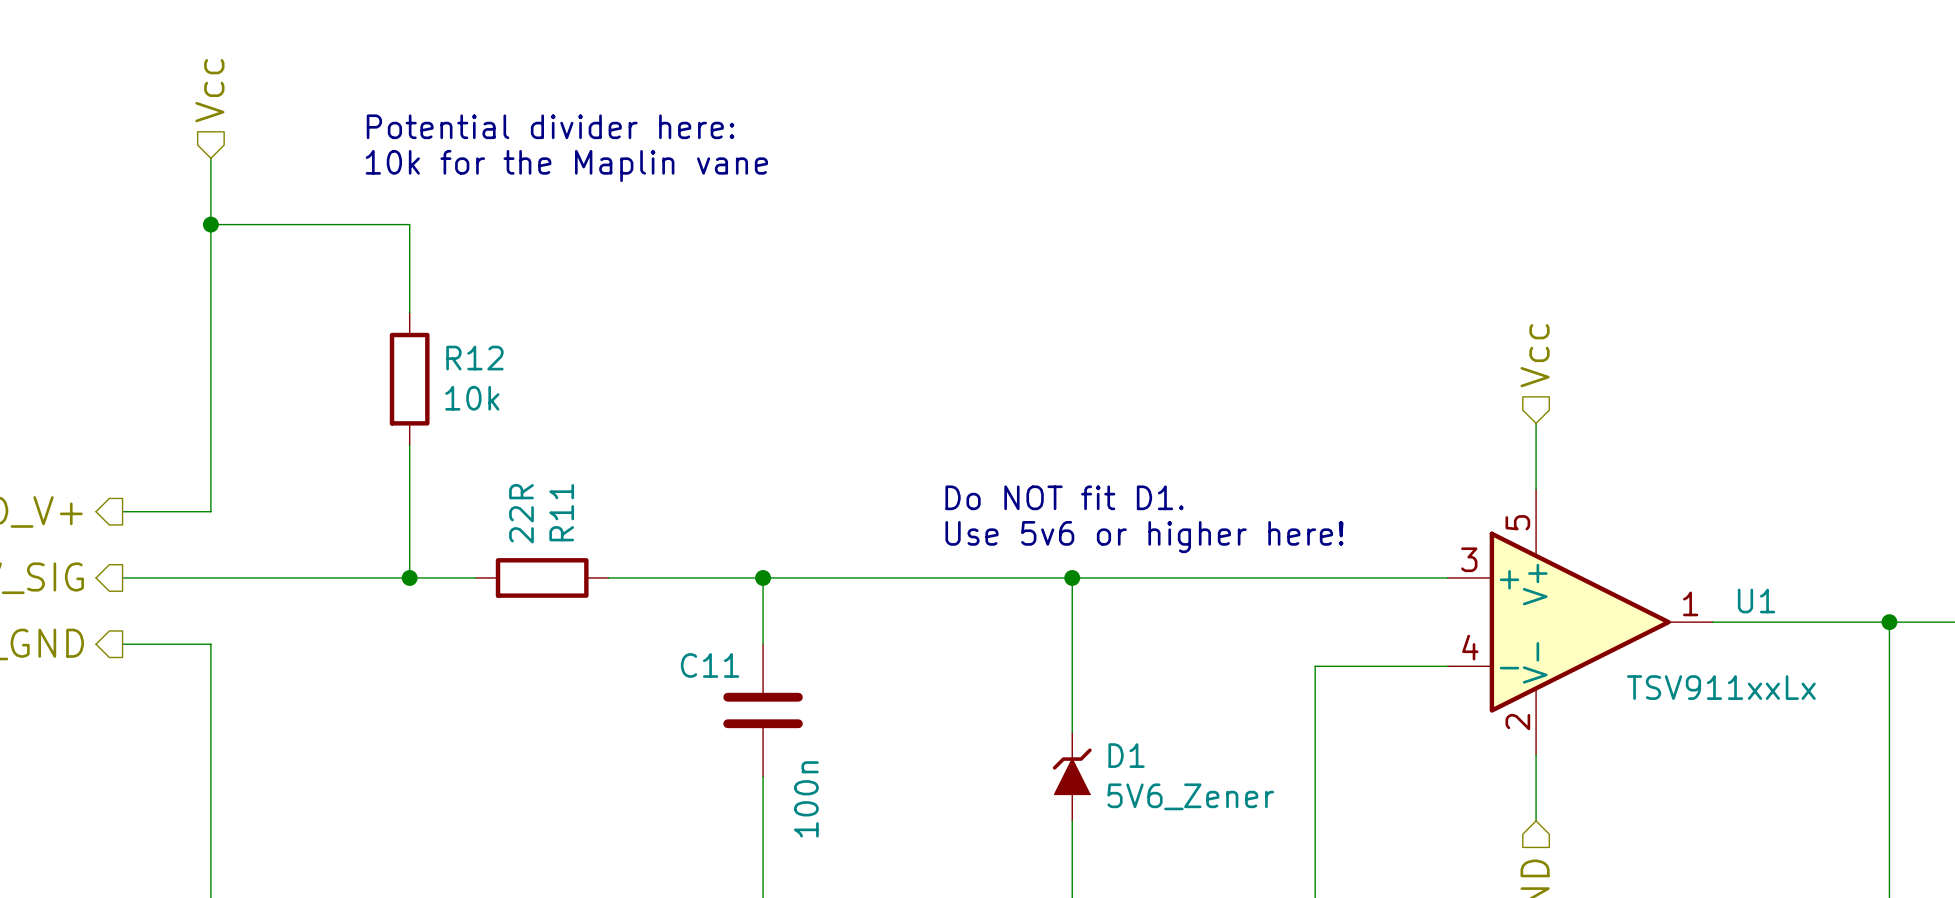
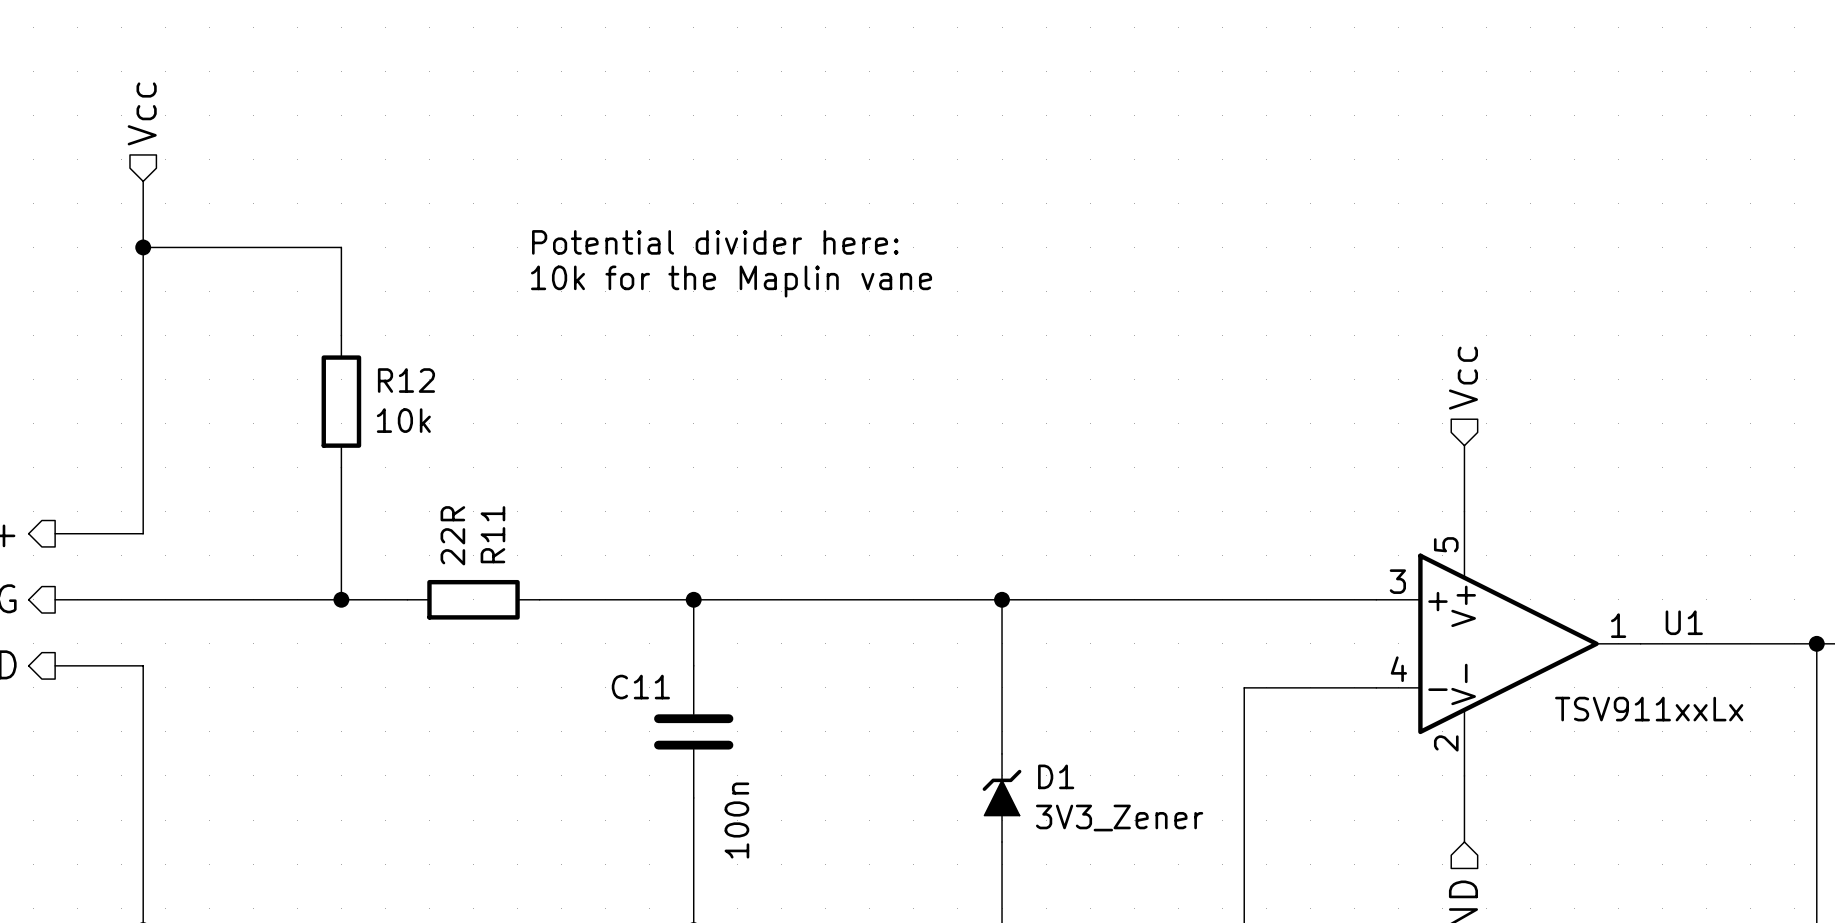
text position: Potential divider here: (550, 126) -> Potential divider here: (715, 242)
text position: 10k for the Maplin vane (566, 166) -> 10k for the Maplin vane (731, 281)
text: Do NOT fit D1. (1064, 497) -> none
text: Use 5v6 or higher here! (1144, 537) -> none
D1 value: 5V6_Zener (1190, 796) -> 3V3_Zener (1119, 818)

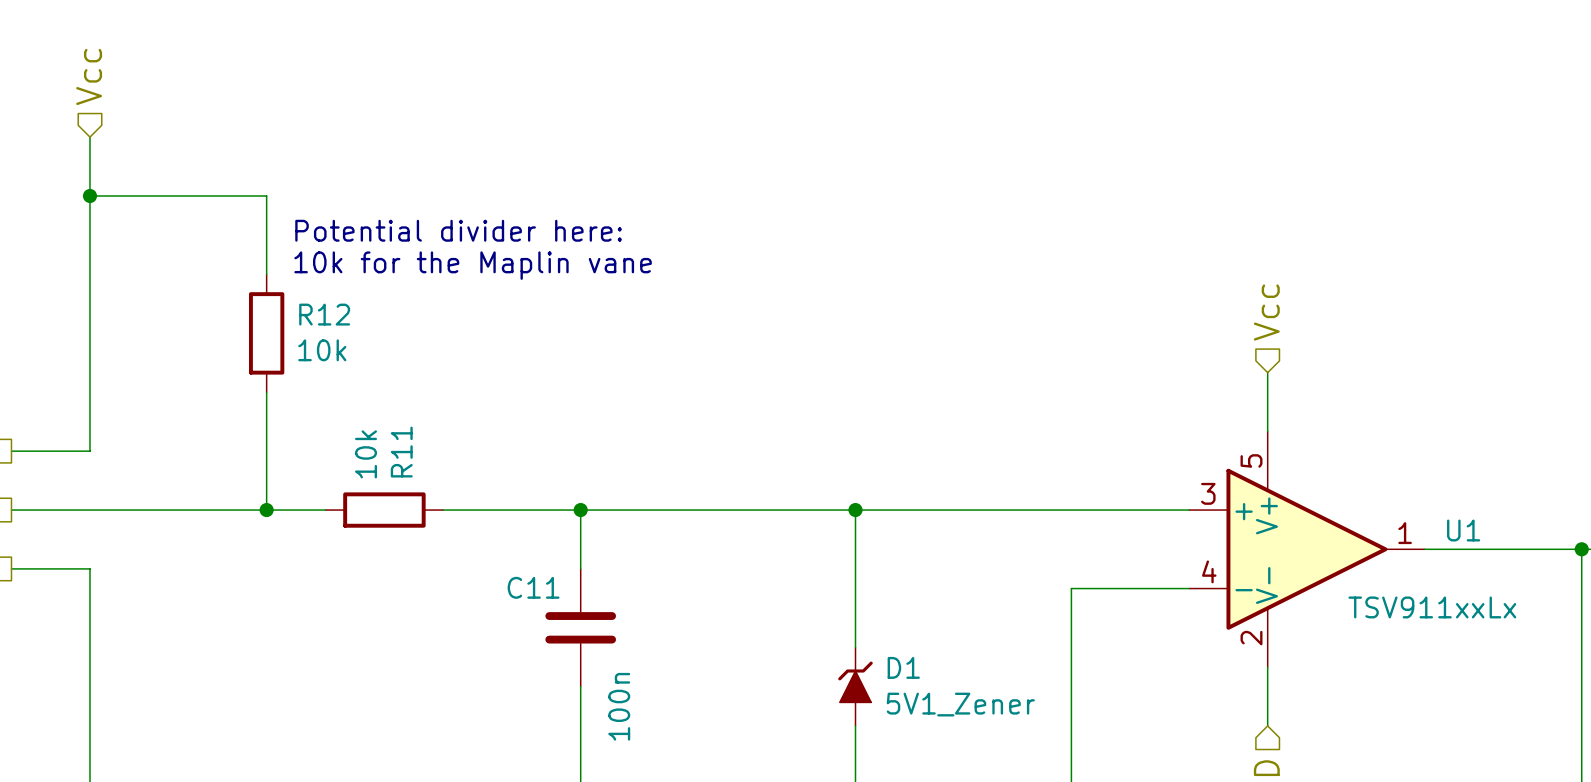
text position: Potential divider here: (715, 242) -> Potential divider here: (458, 230)
text position: 10k for the Maplin vane (731, 281) -> 10k for the Maplin vane (473, 265)
R11 value: 22R (452, 535) -> 10k (366, 454)
D1 value: 3V3_Zener (1119, 818) -> 5V1_Zener (960, 704)

